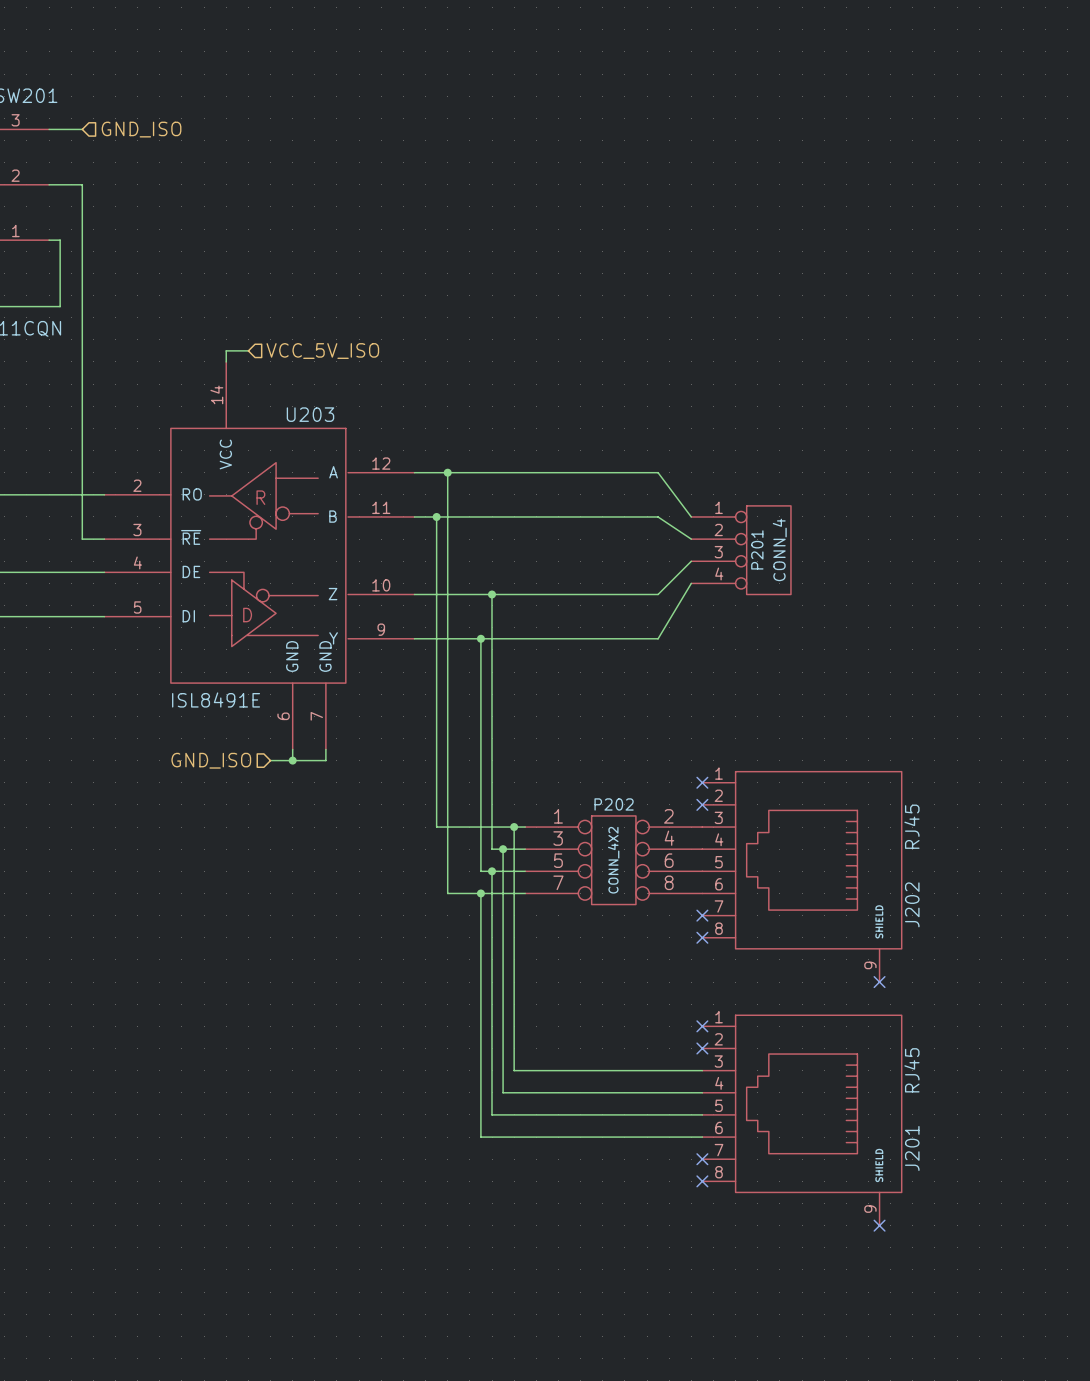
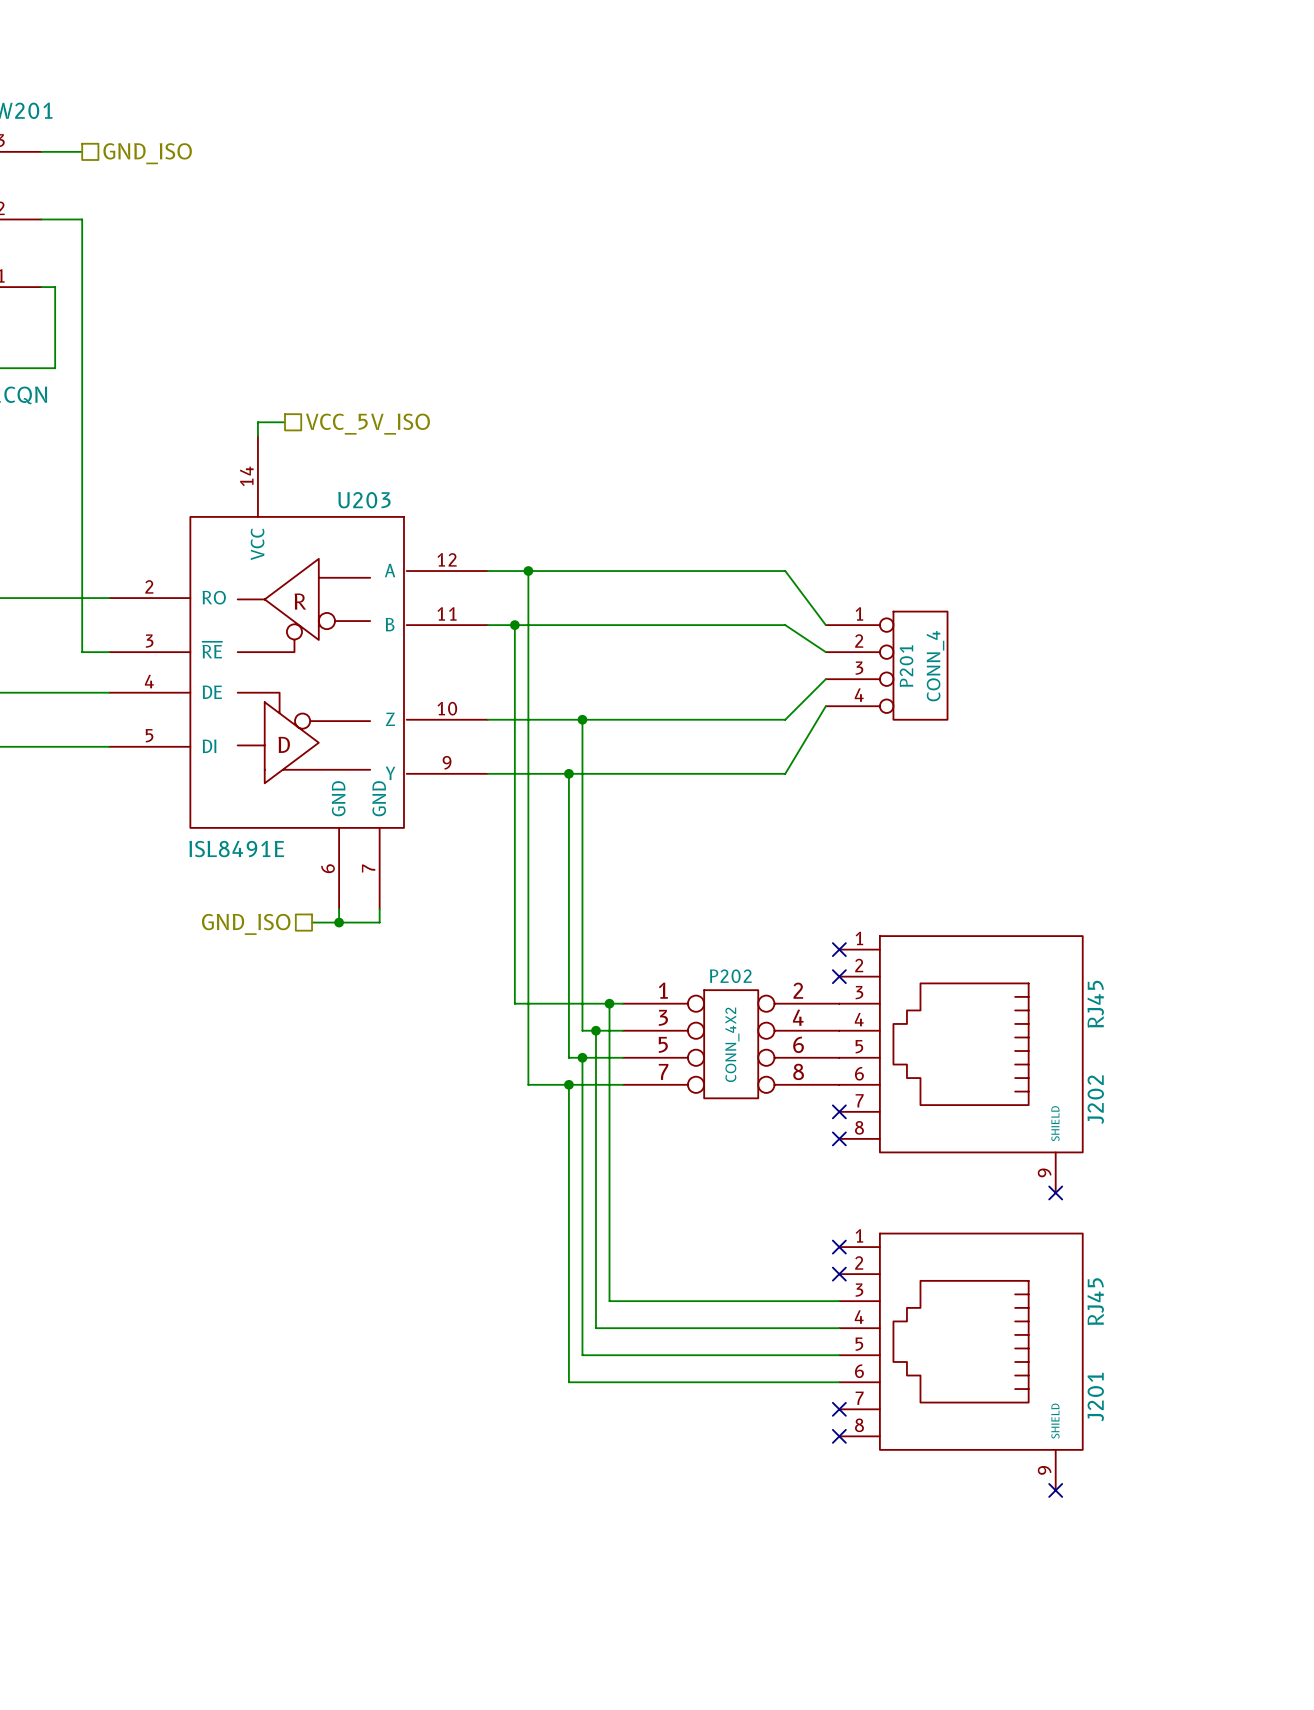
hierarchical label shape: input (141, 129) -> passive (147, 153)
hierarchical label shape: input (322, 351) -> passive (367, 424)
hierarchical label shape: input (211, 760) -> passive (246, 924)

